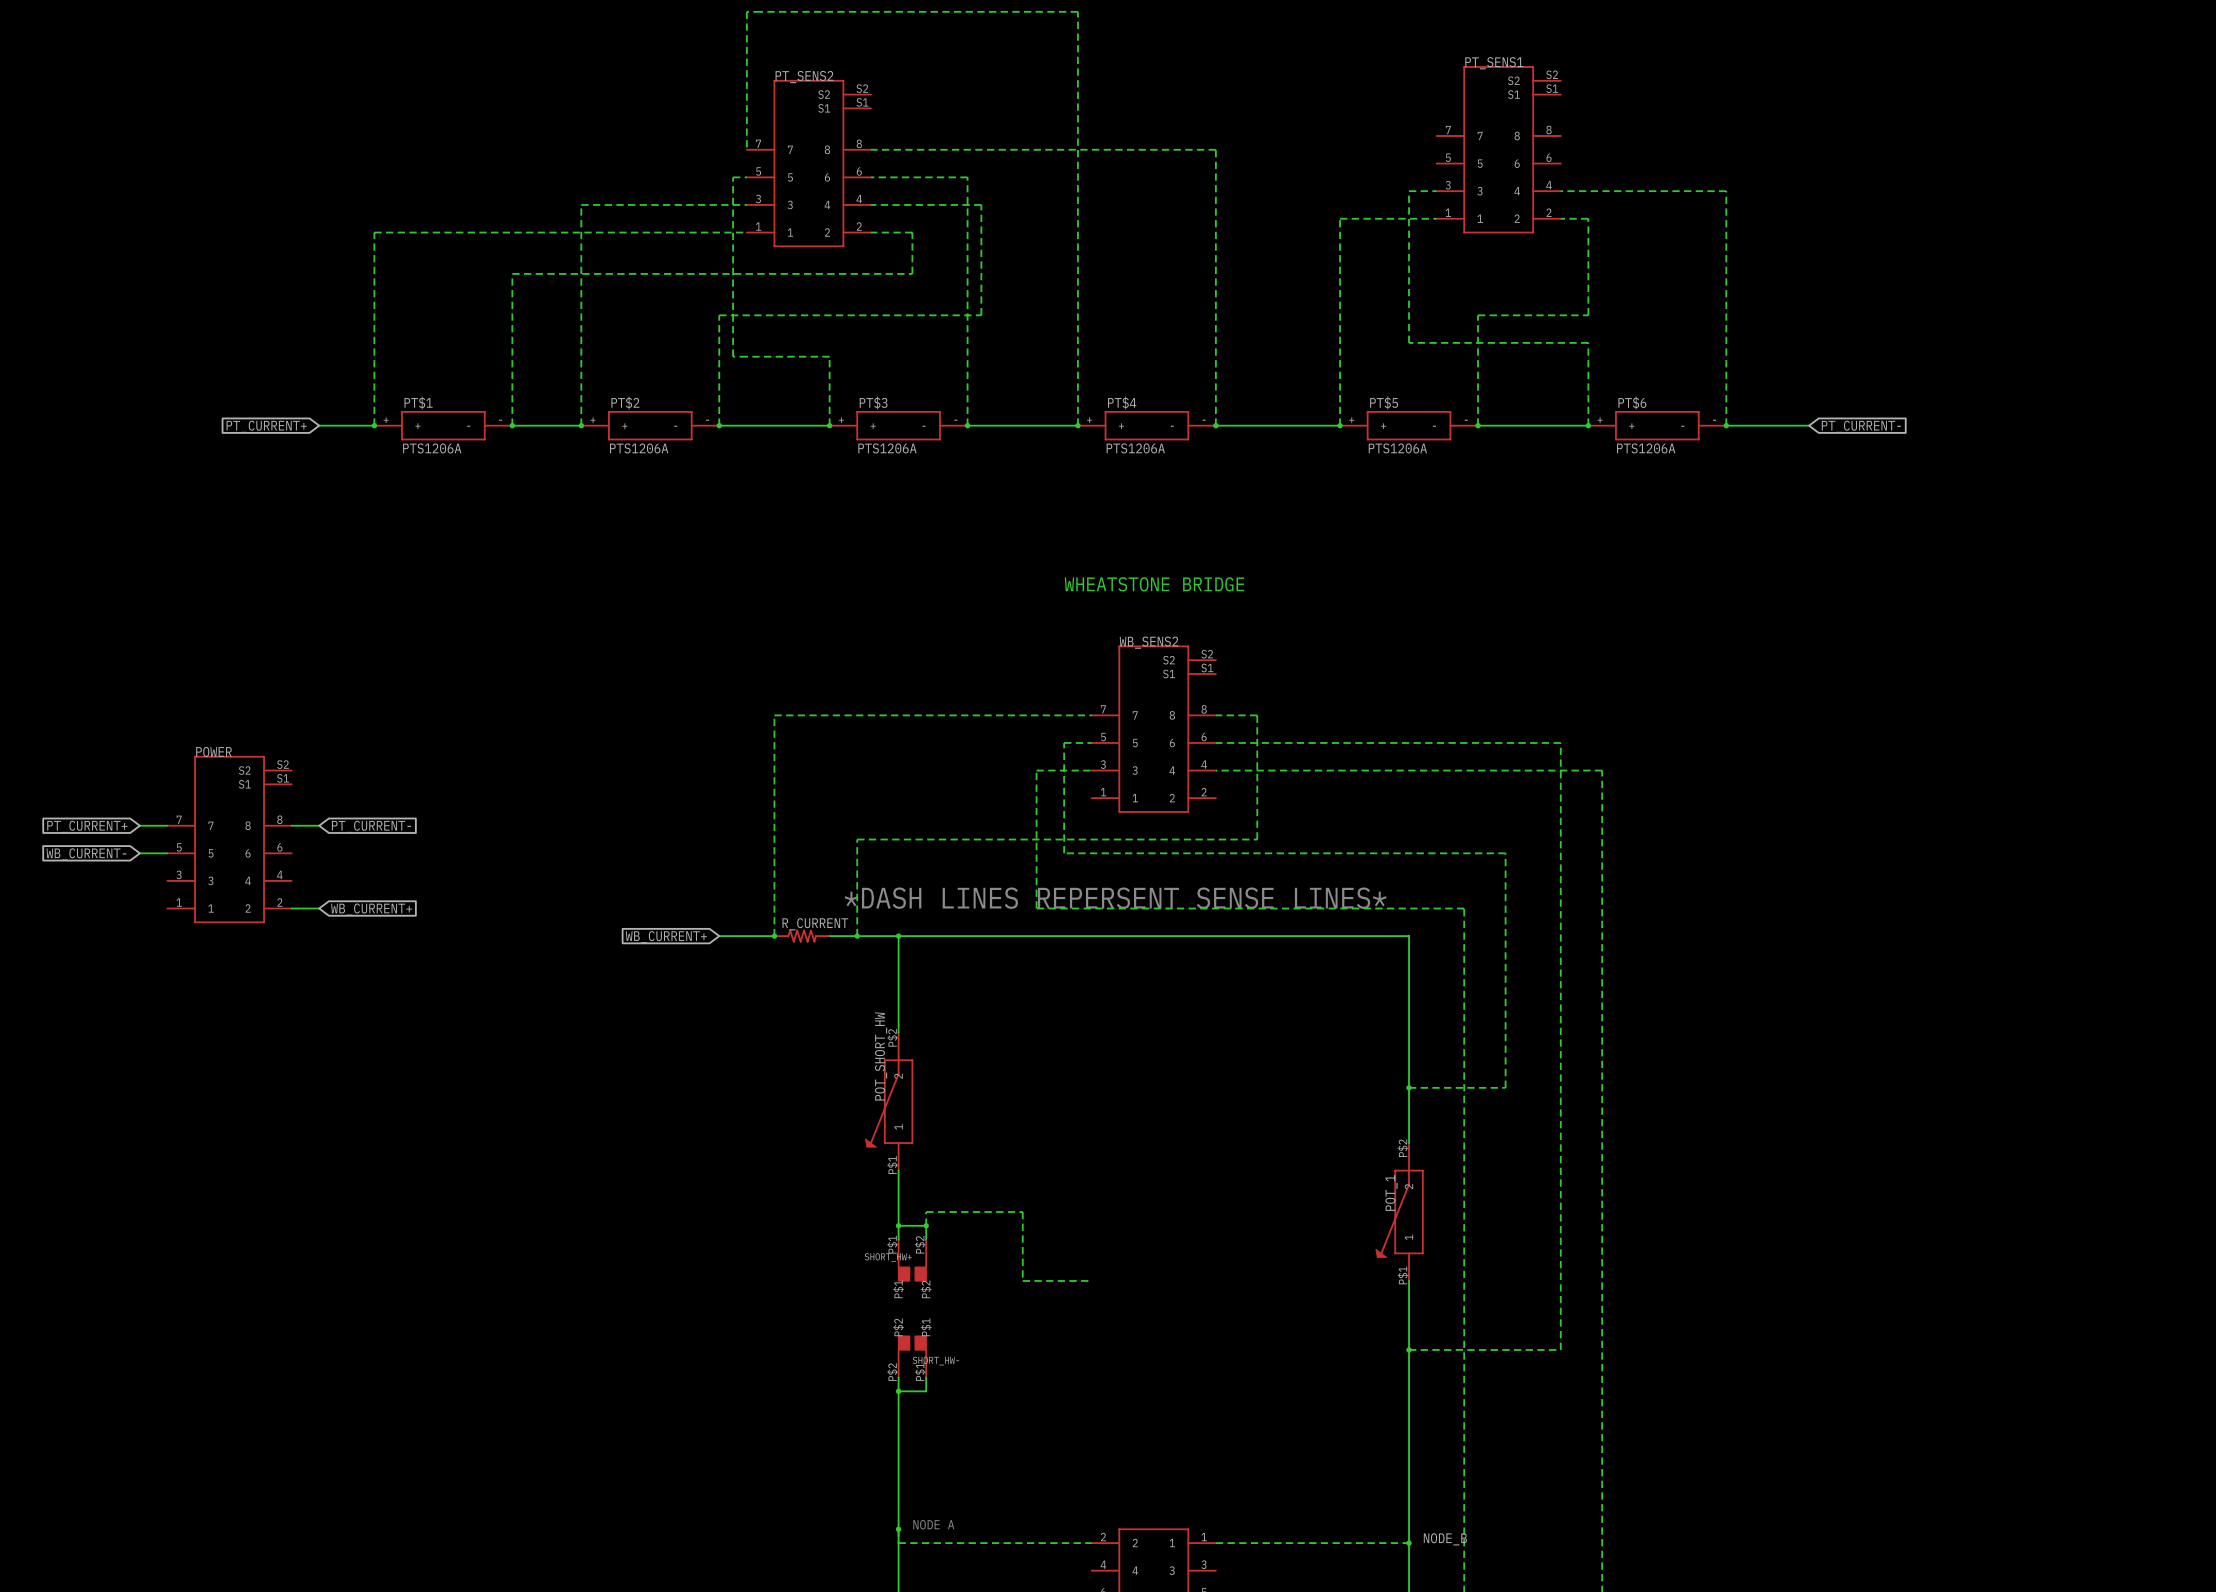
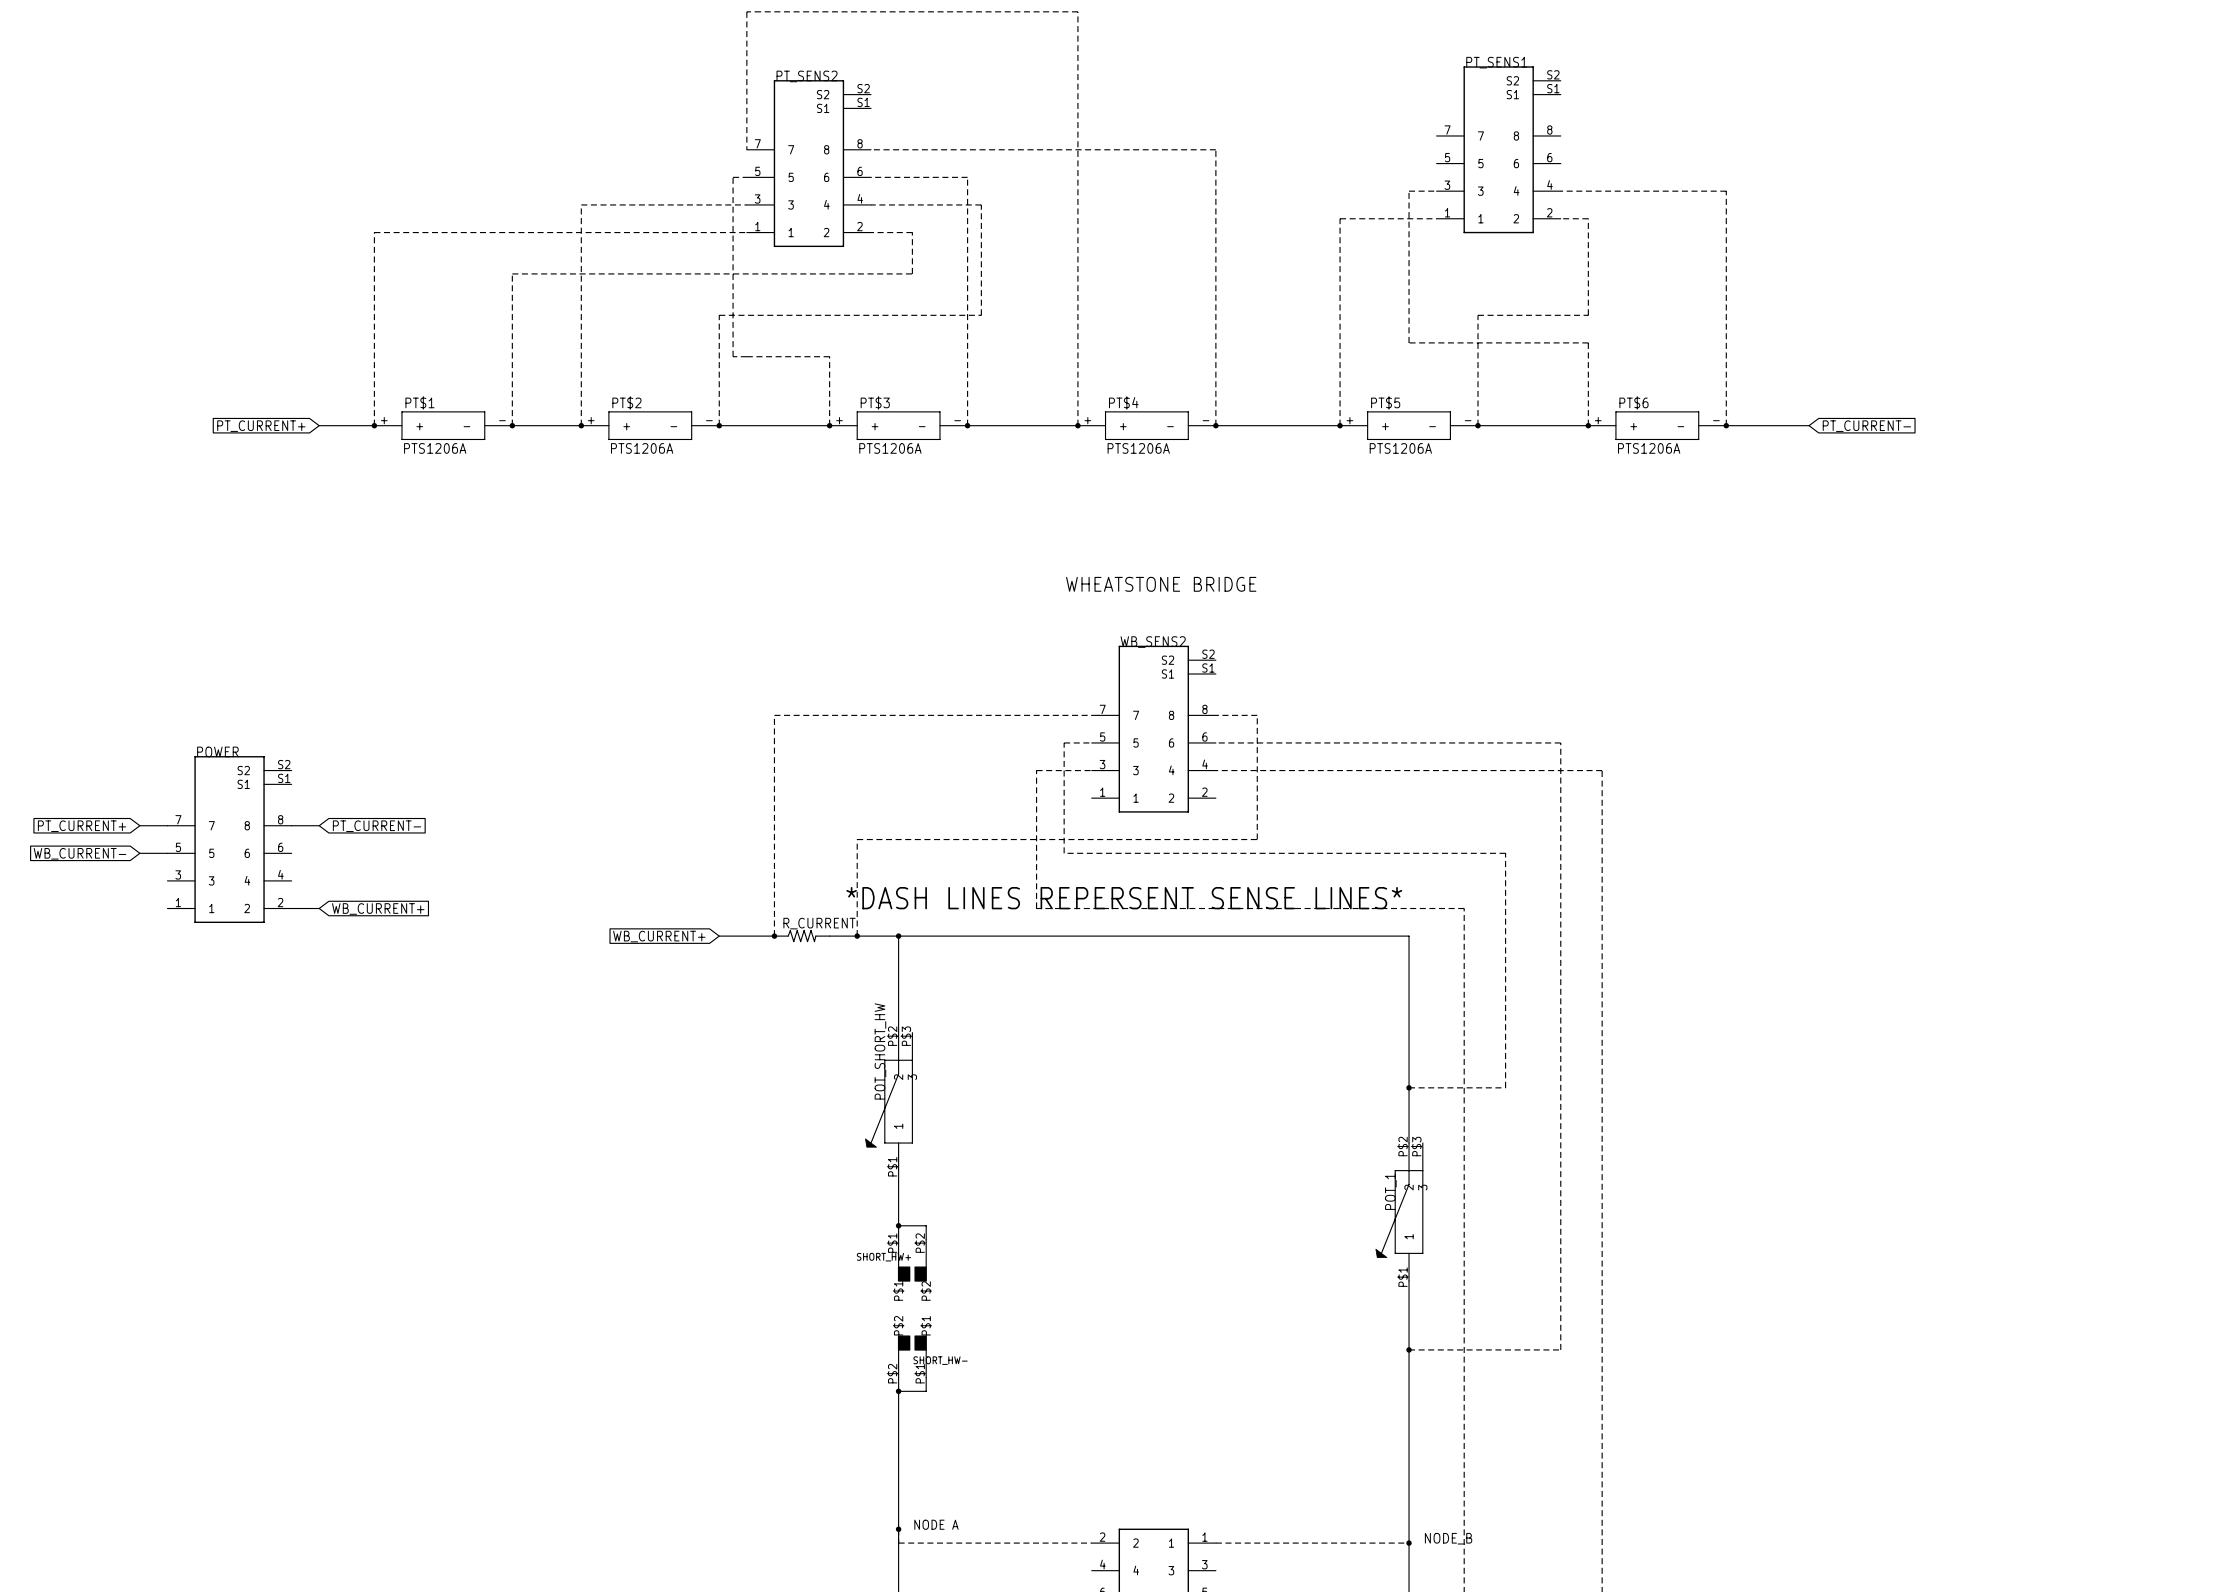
POT_SHORT_HW symbol: [865, 1032, 913, 1171] -> [865, 1032, 913, 1171]
POT_1 symbol: [1375, 1143, 1424, 1281] -> [1375, 1143, 1424, 1281]
wire: (926, 1225) (926, 1212) (1022, 1212) (1022, 1280) (1091, 1280) -> none
junction: (926, 1225) -> none

